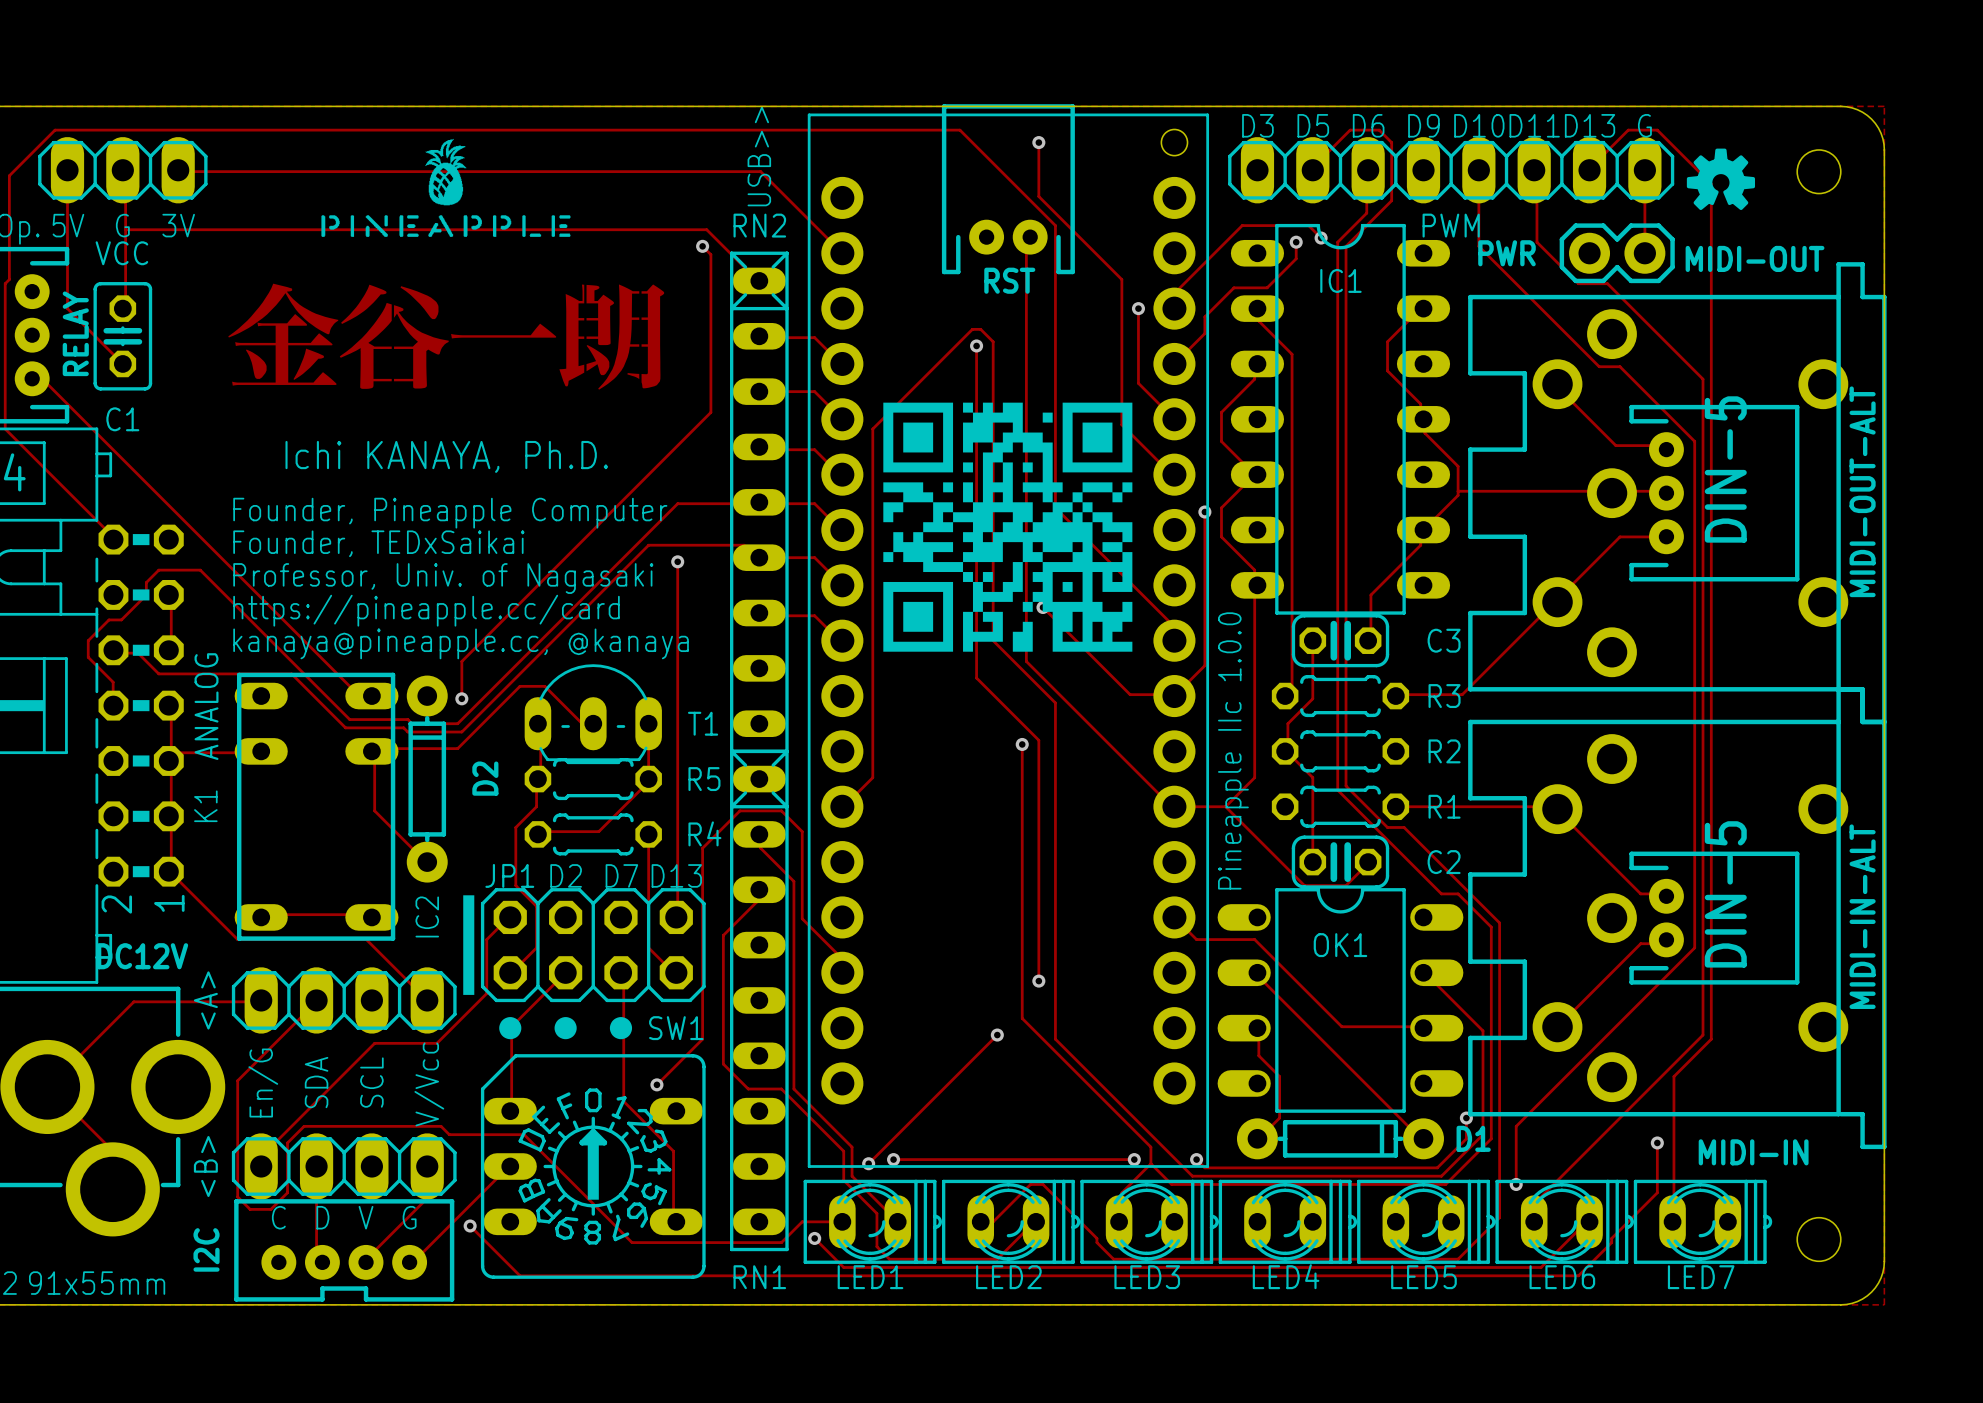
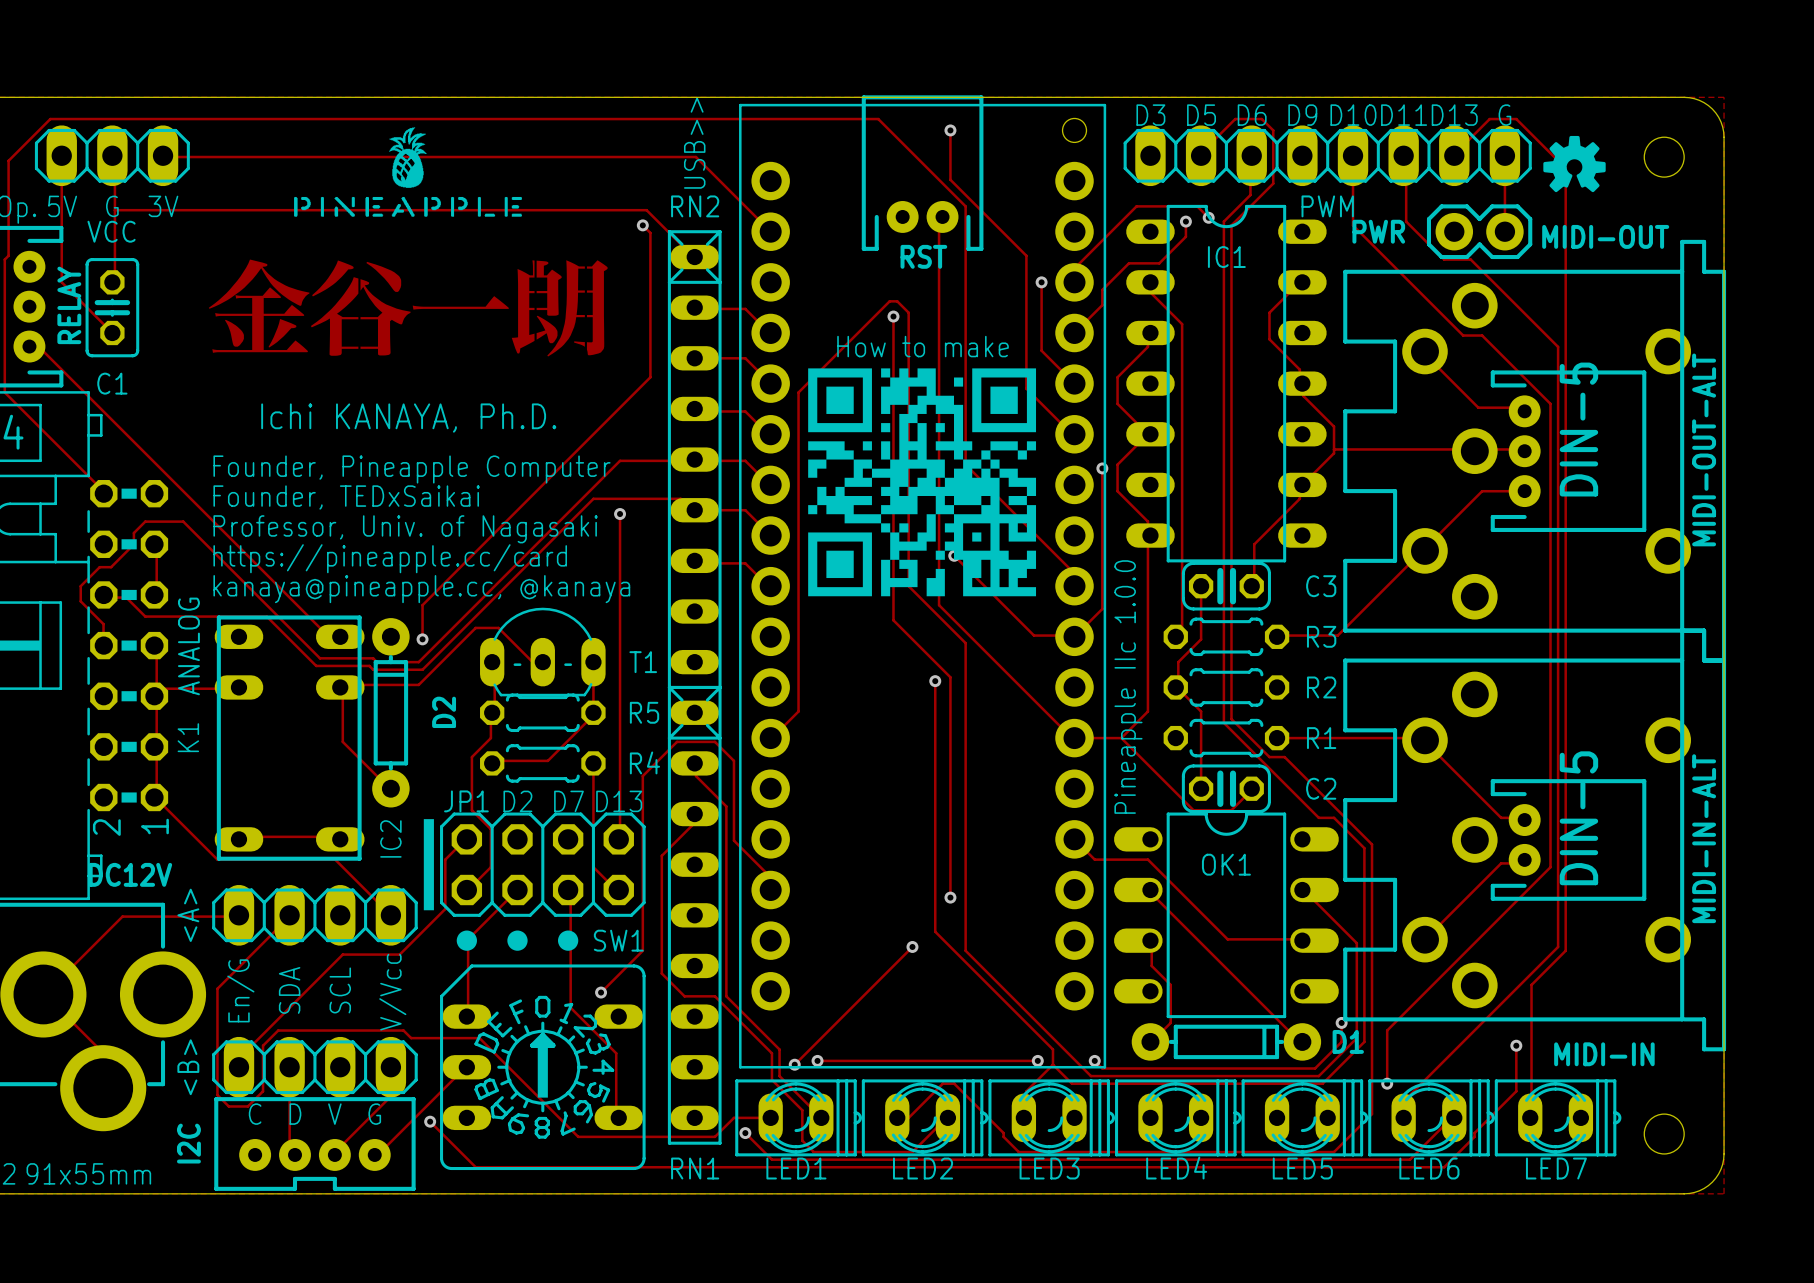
text: none -> How to make (923, 346)

